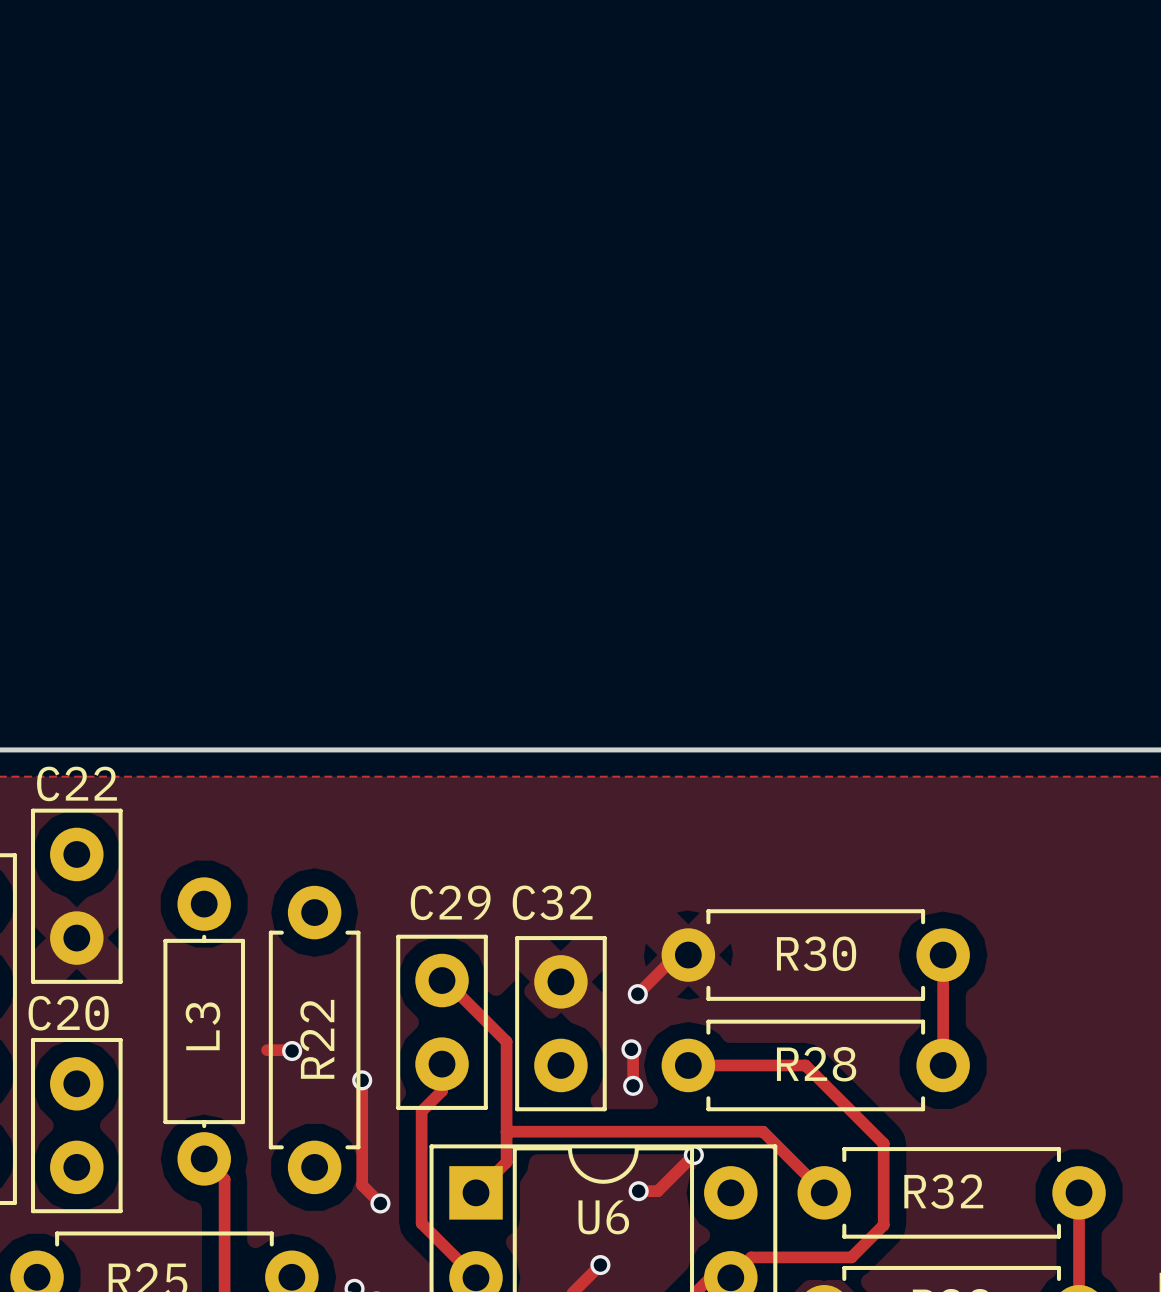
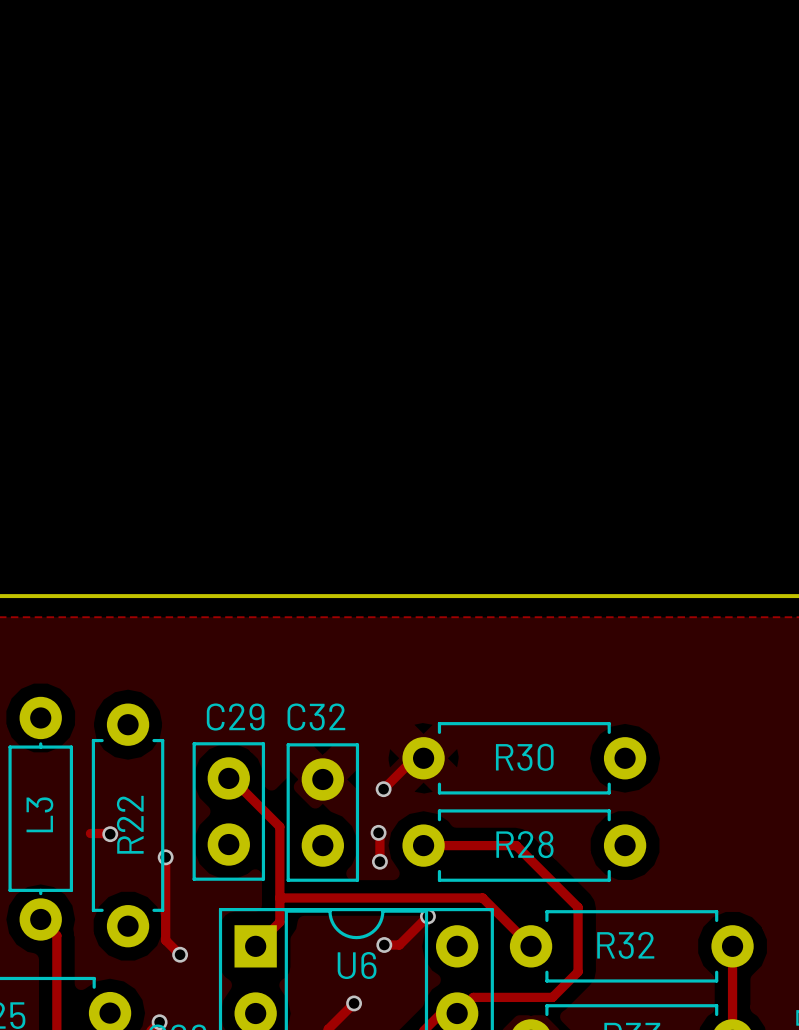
track: (943, 955) (943, 1065) -> none
track: (442, 1064) (442, 1090) (421, 1111) (421, 1223) (476, 1277) -> none

